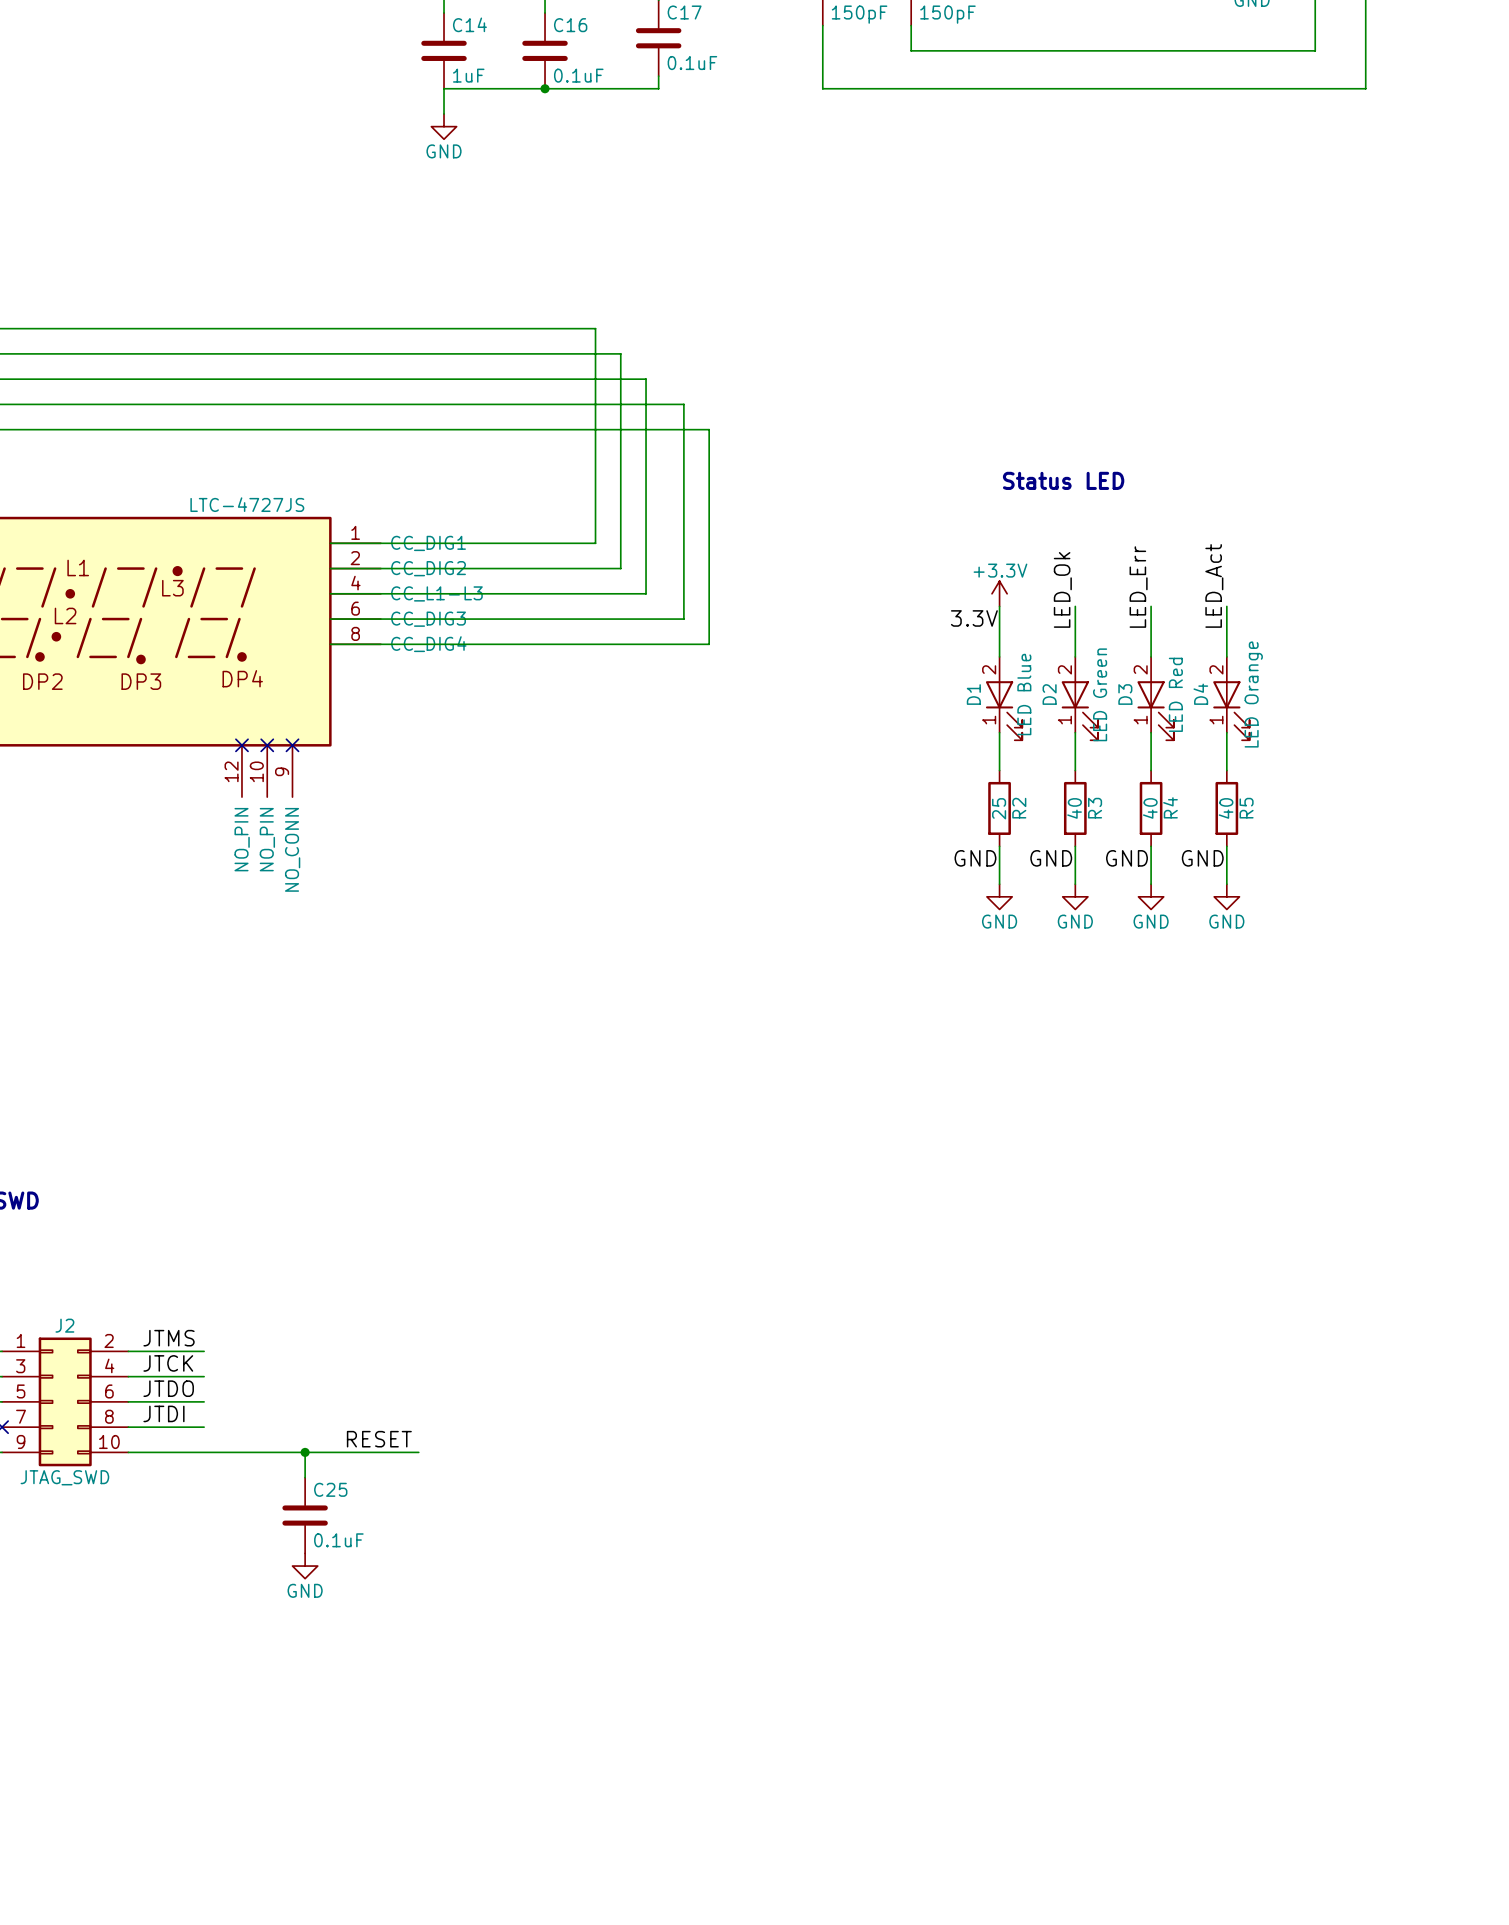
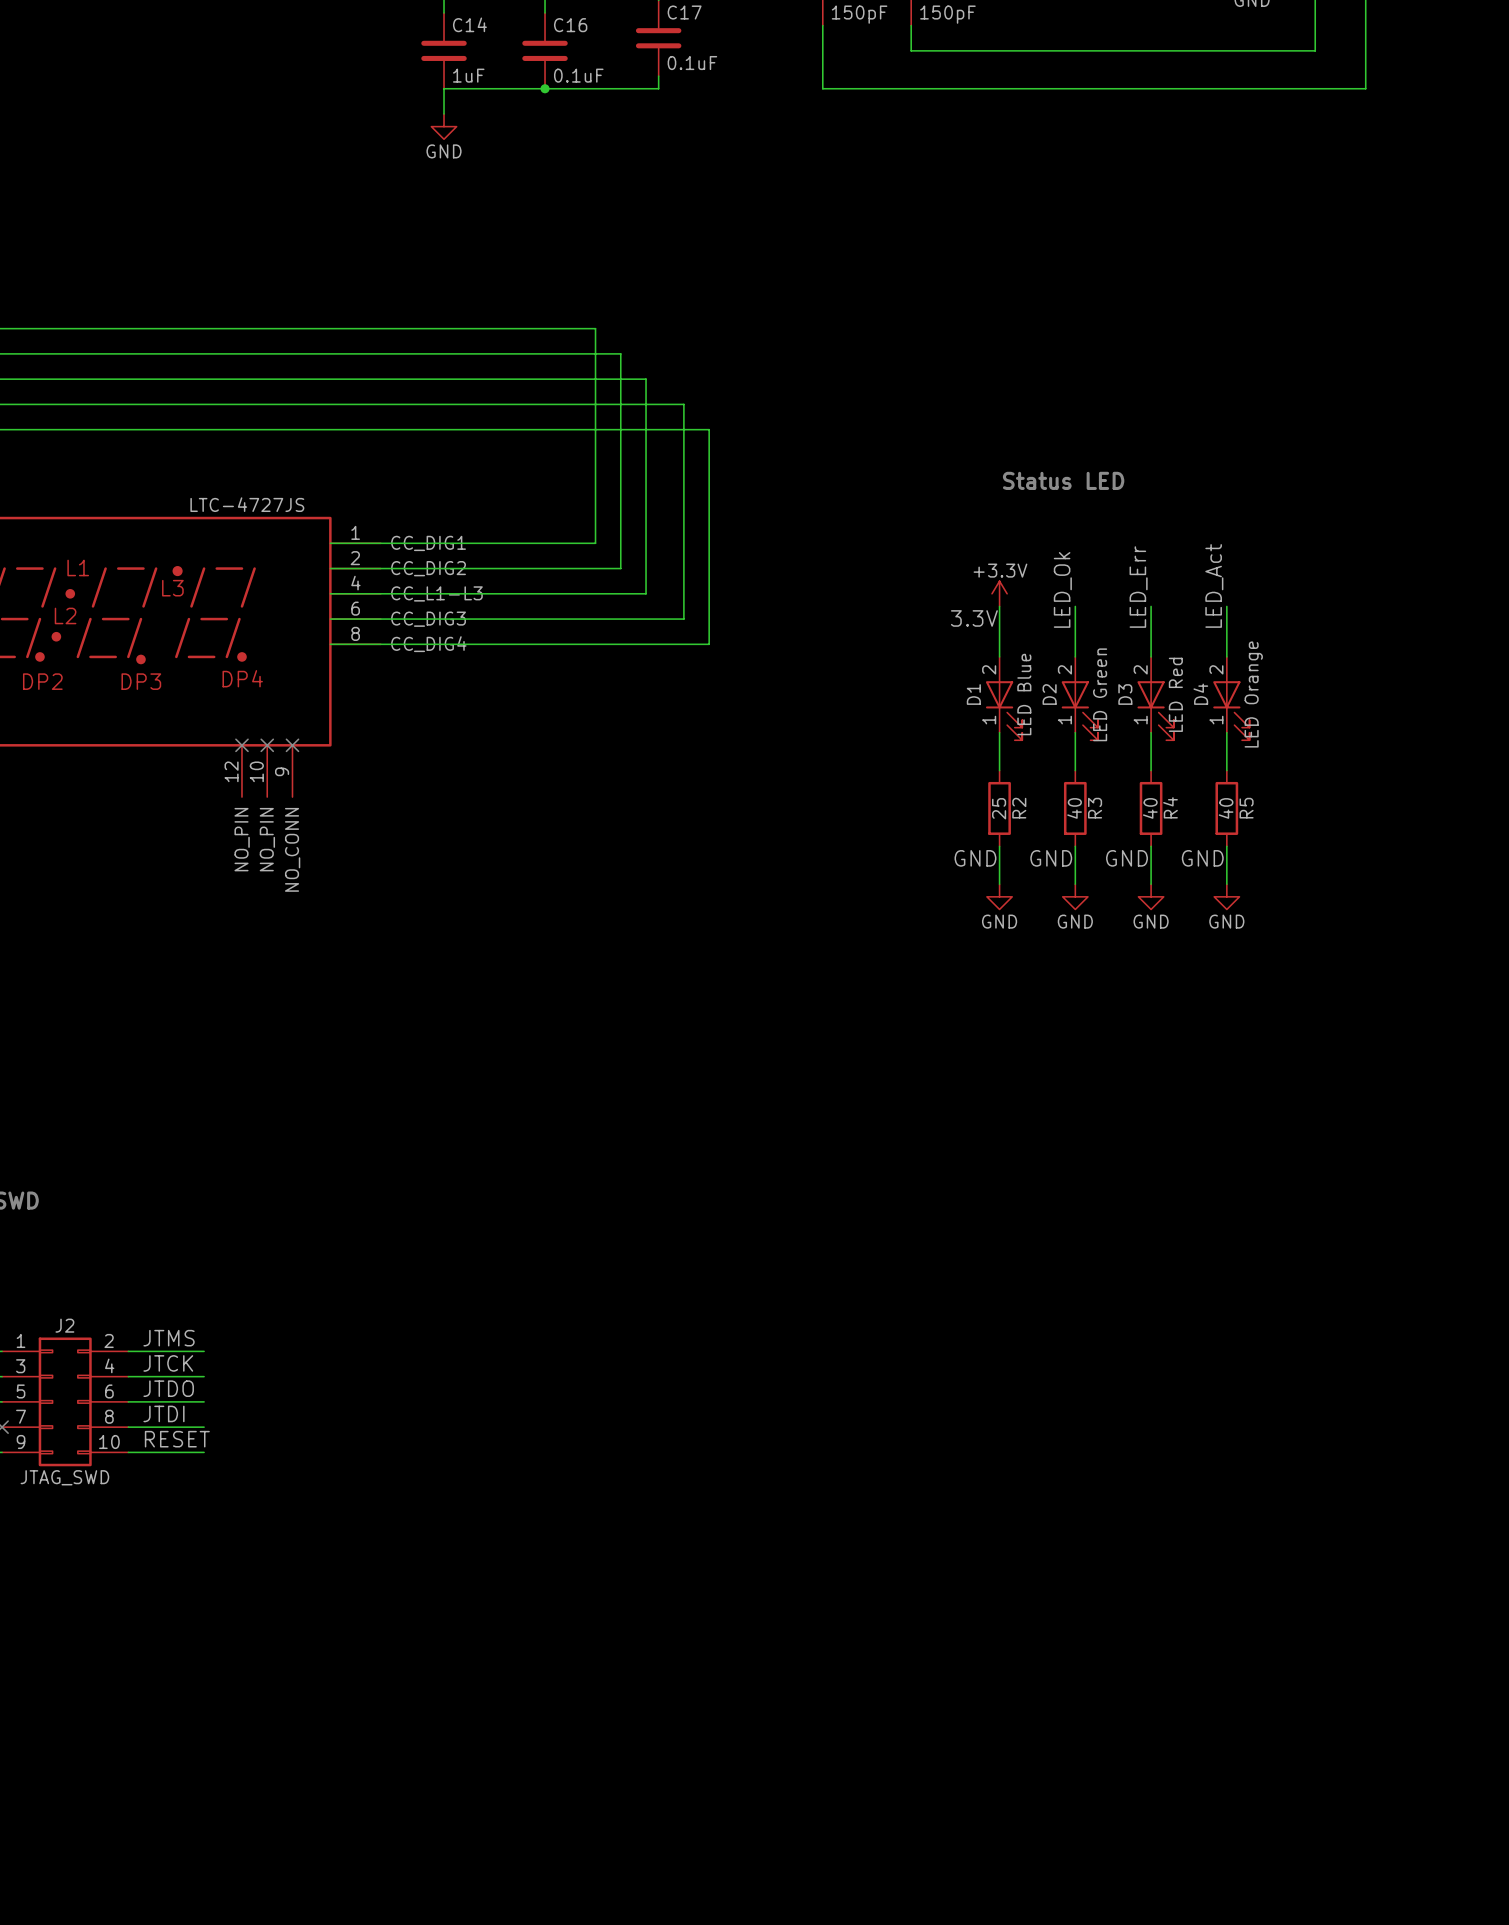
label position: RESET (379, 1439) -> RESET (177, 1439)
wire: (204, 1452) (418, 1452) -> none
wire: (305, 1452) (305, 1477) -> none
junction: (305, 1452) -> none
C25: 0.1uF (305, 1515) -> none
power symbol: GND (305, 1566) -> none

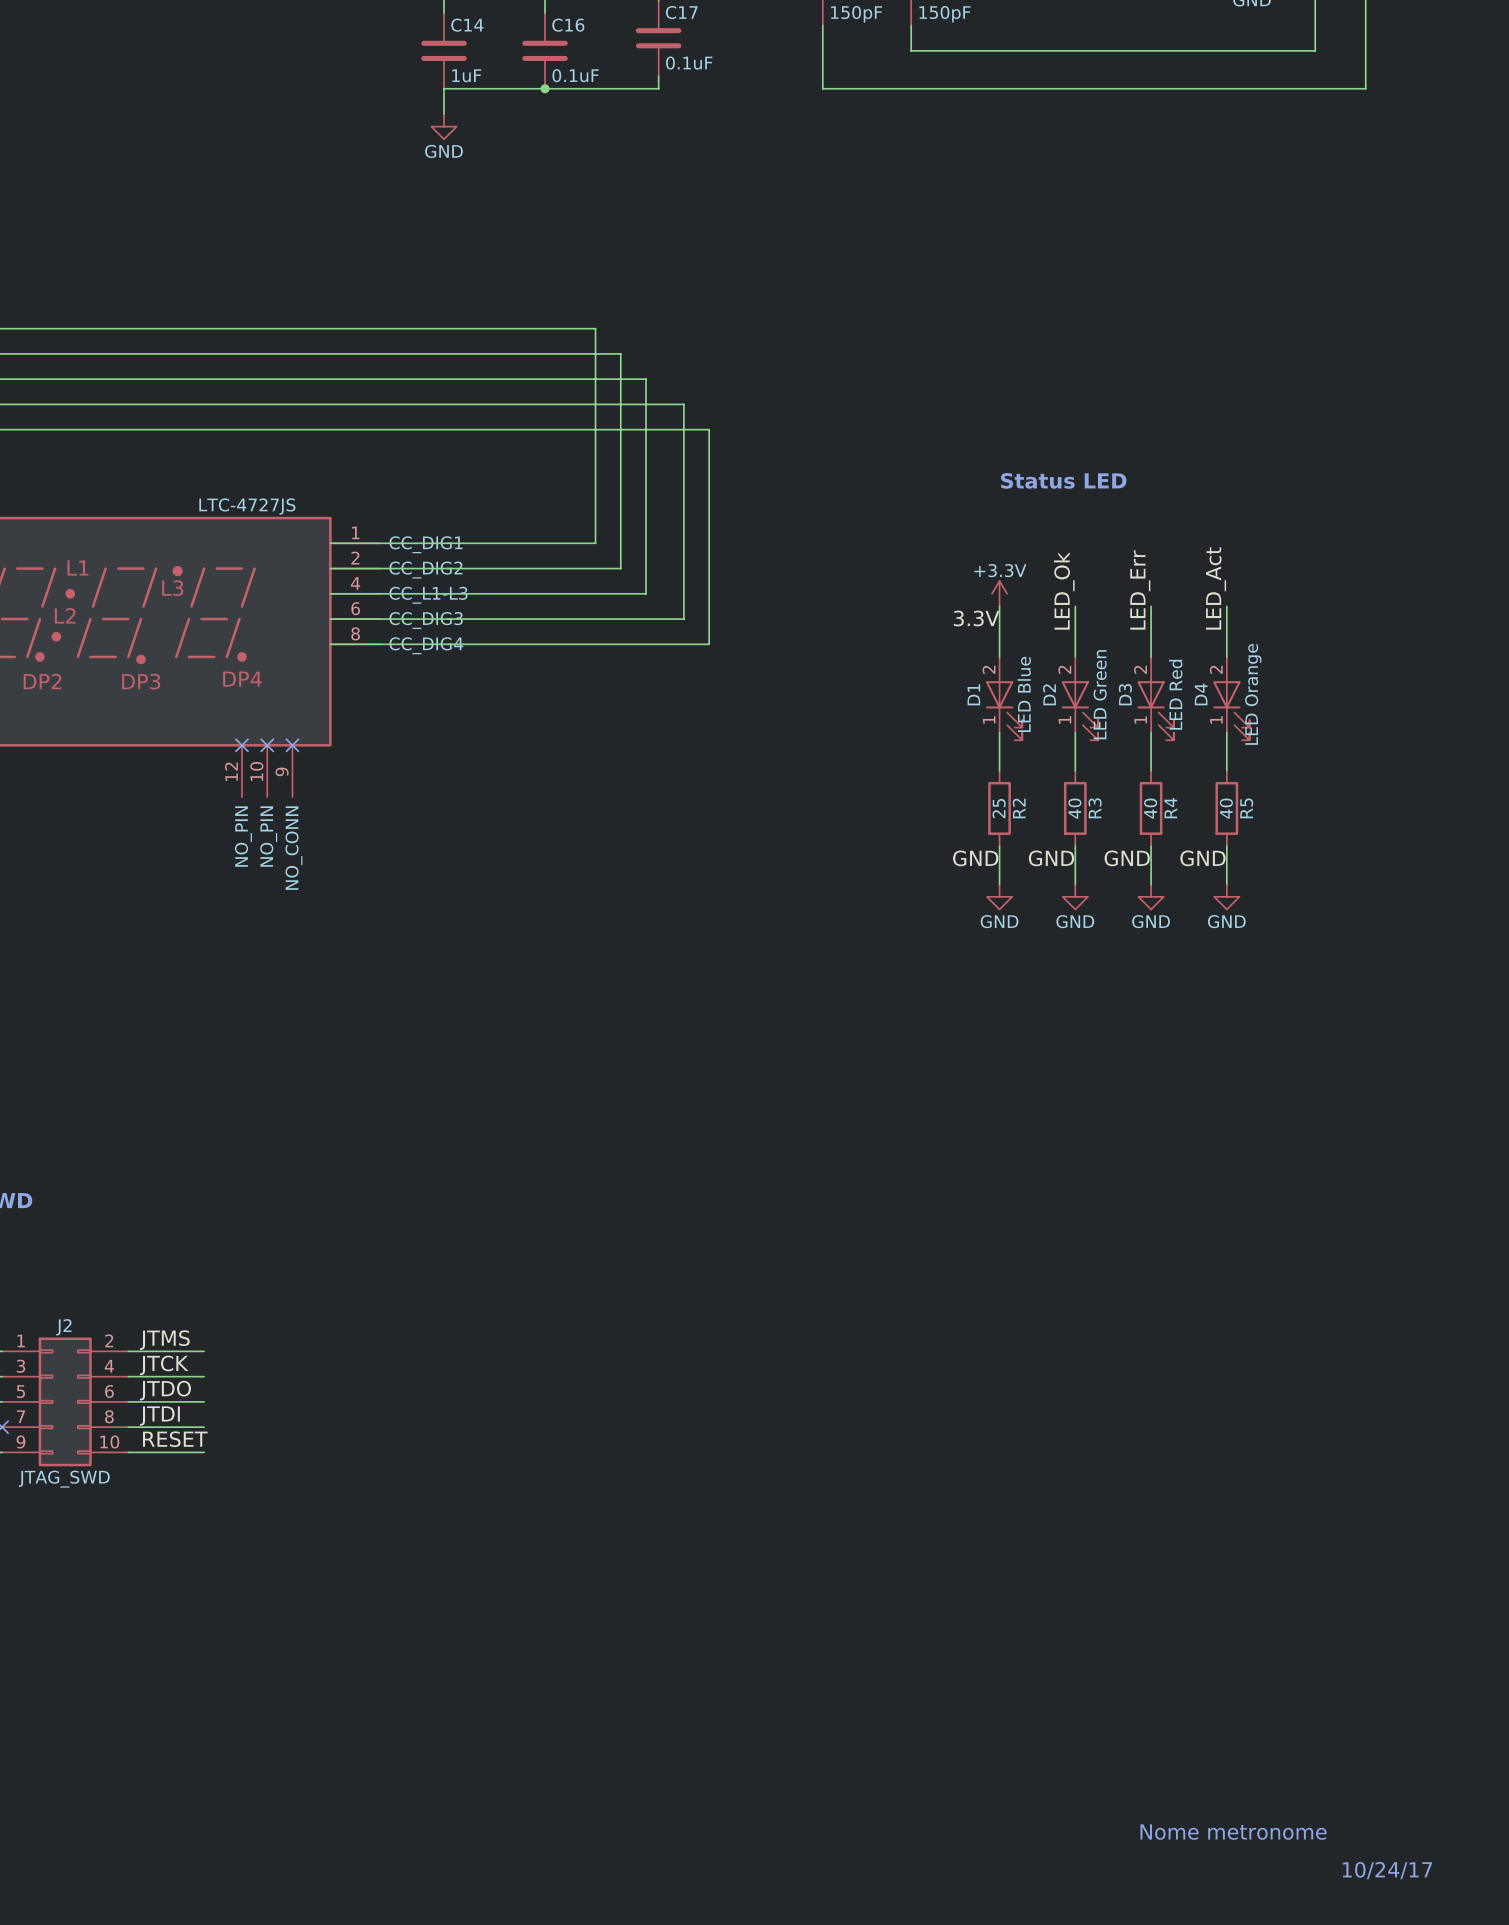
text: none -> Nome metronome (1233, 1832)
text: none -> 10/24/17 (1387, 1870)

